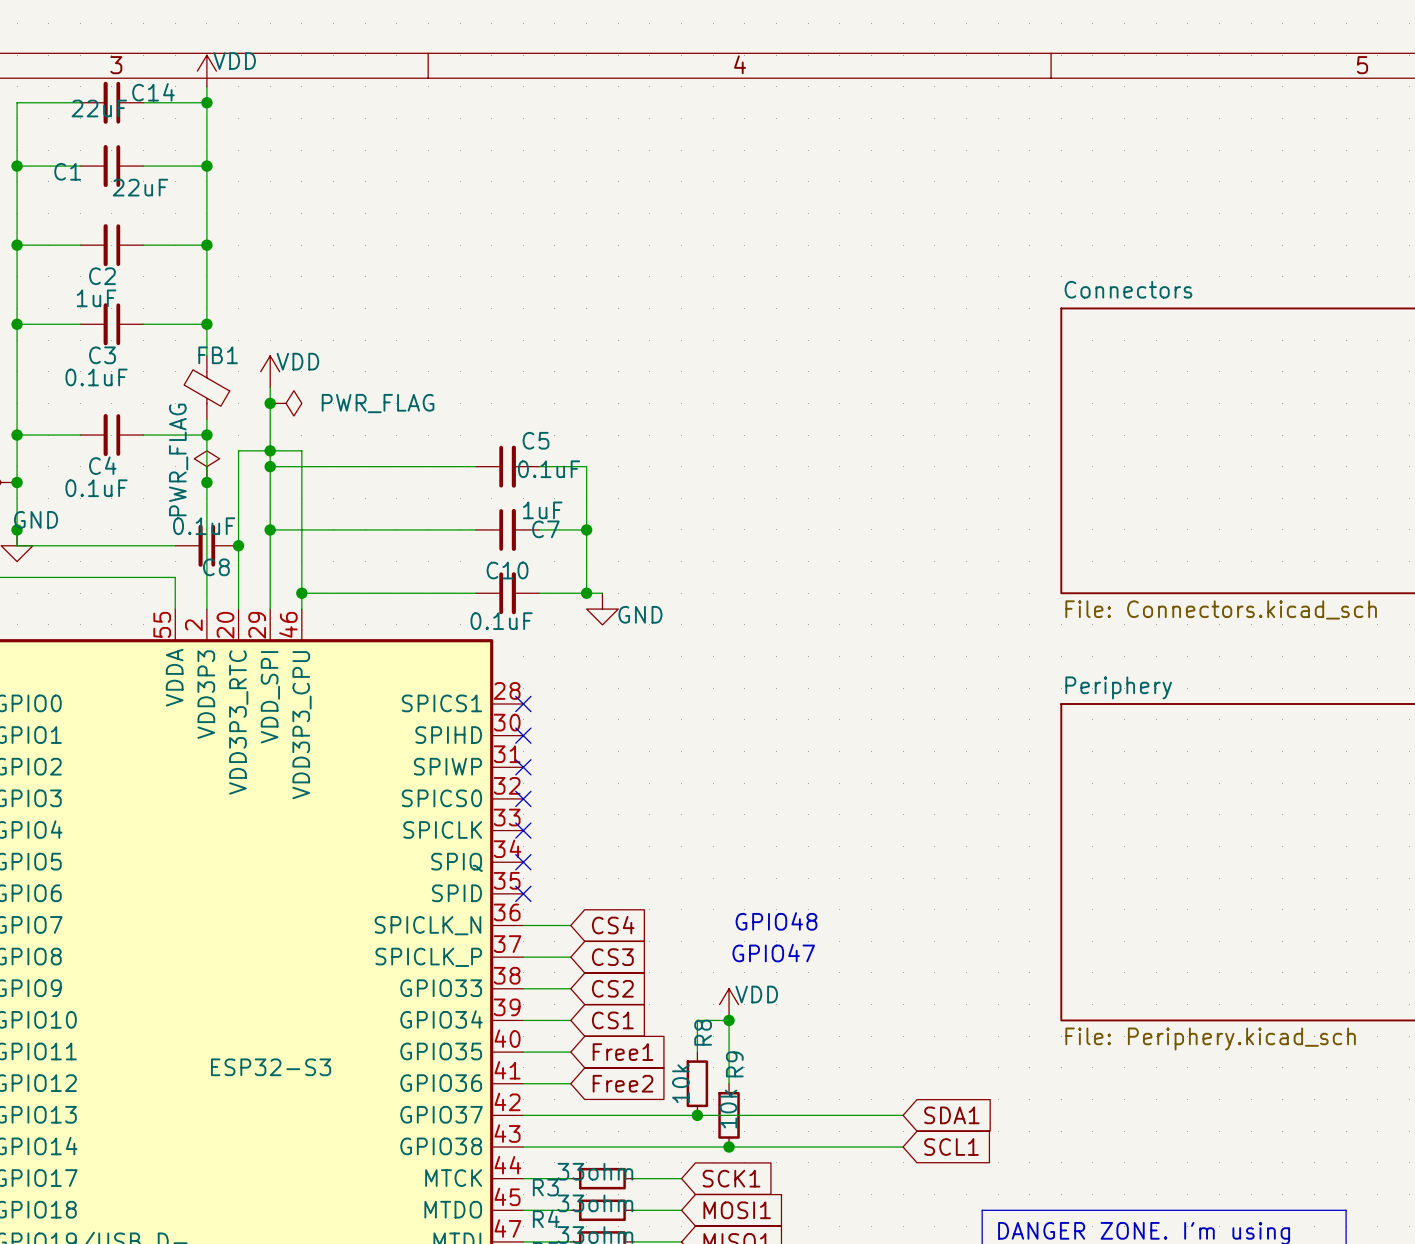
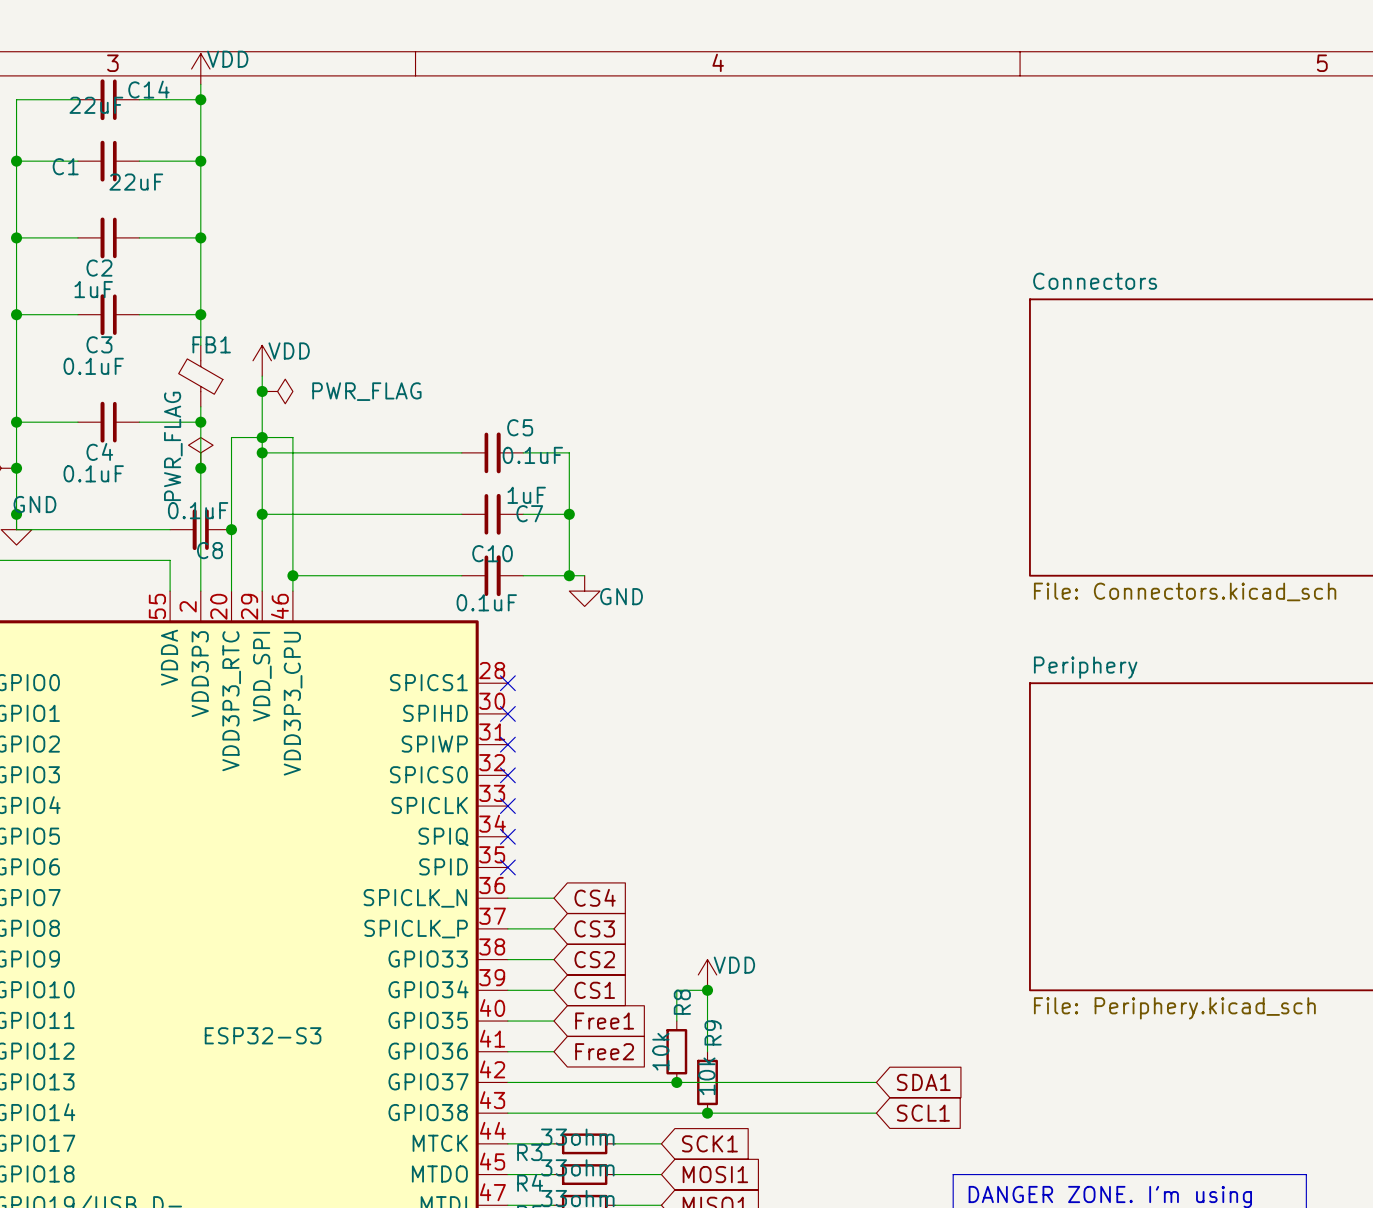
text: GPIO48 (776, 921) -> none
text: GPIO47 (773, 953) -> none

